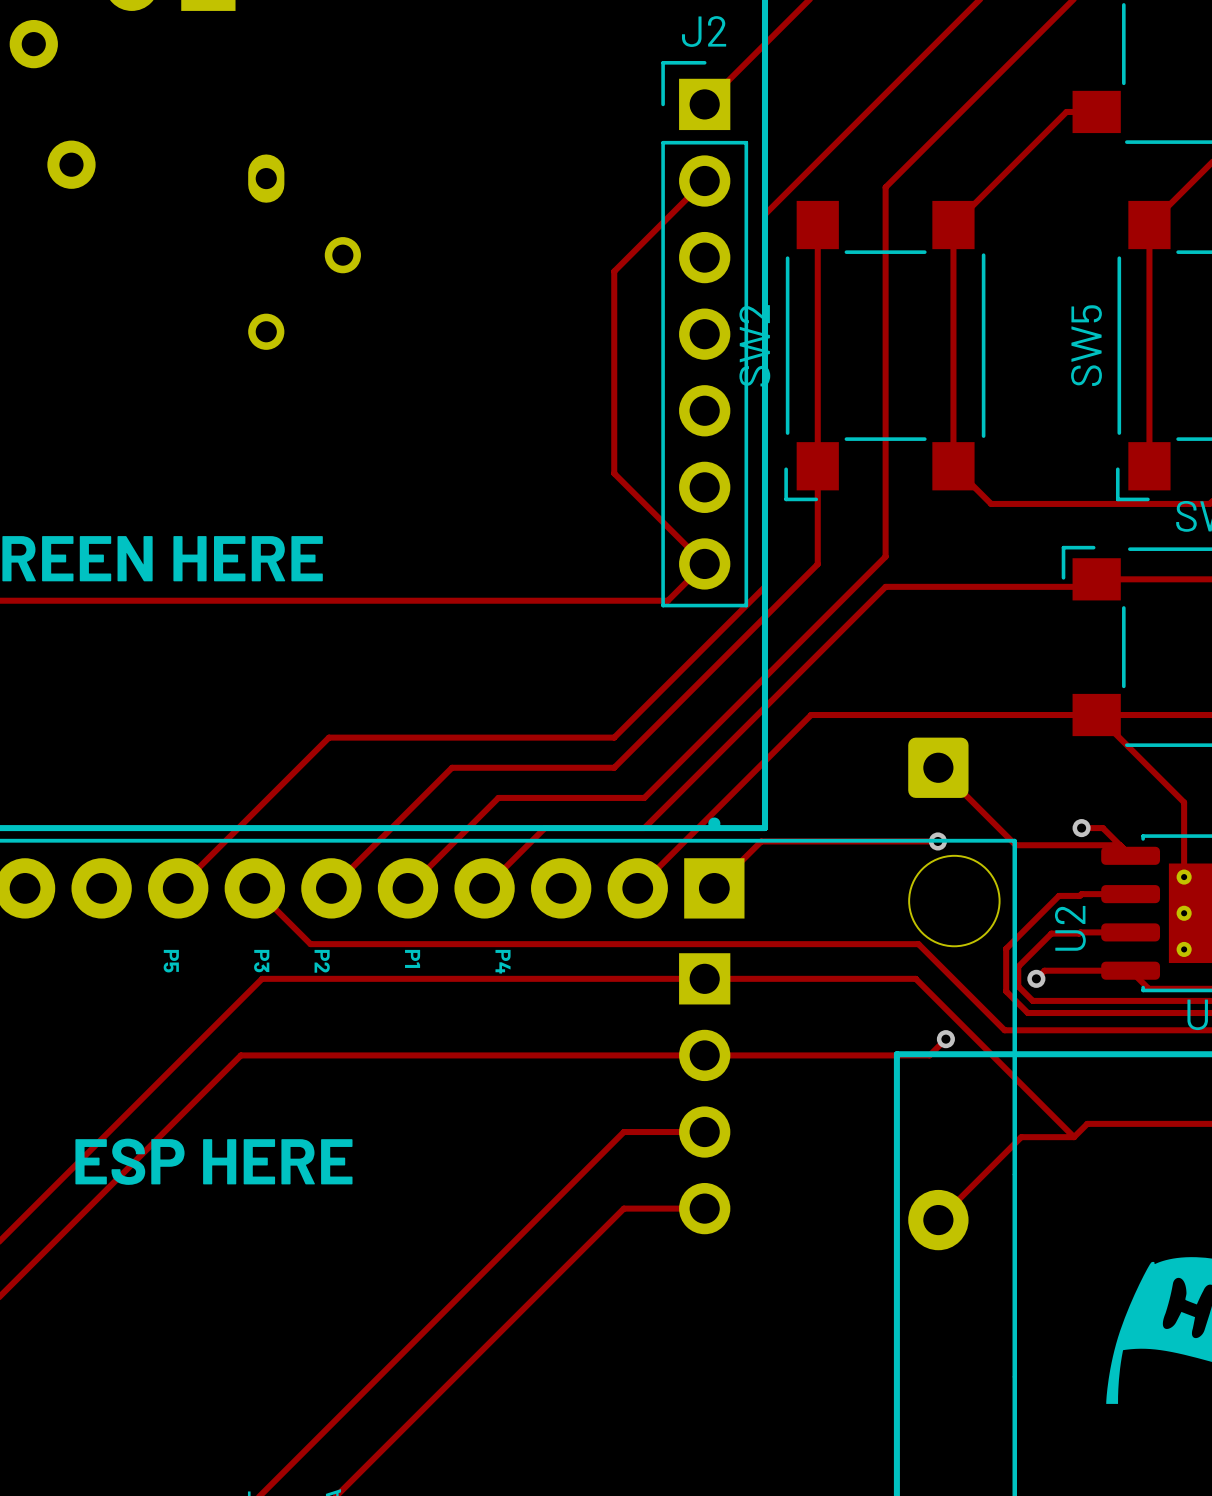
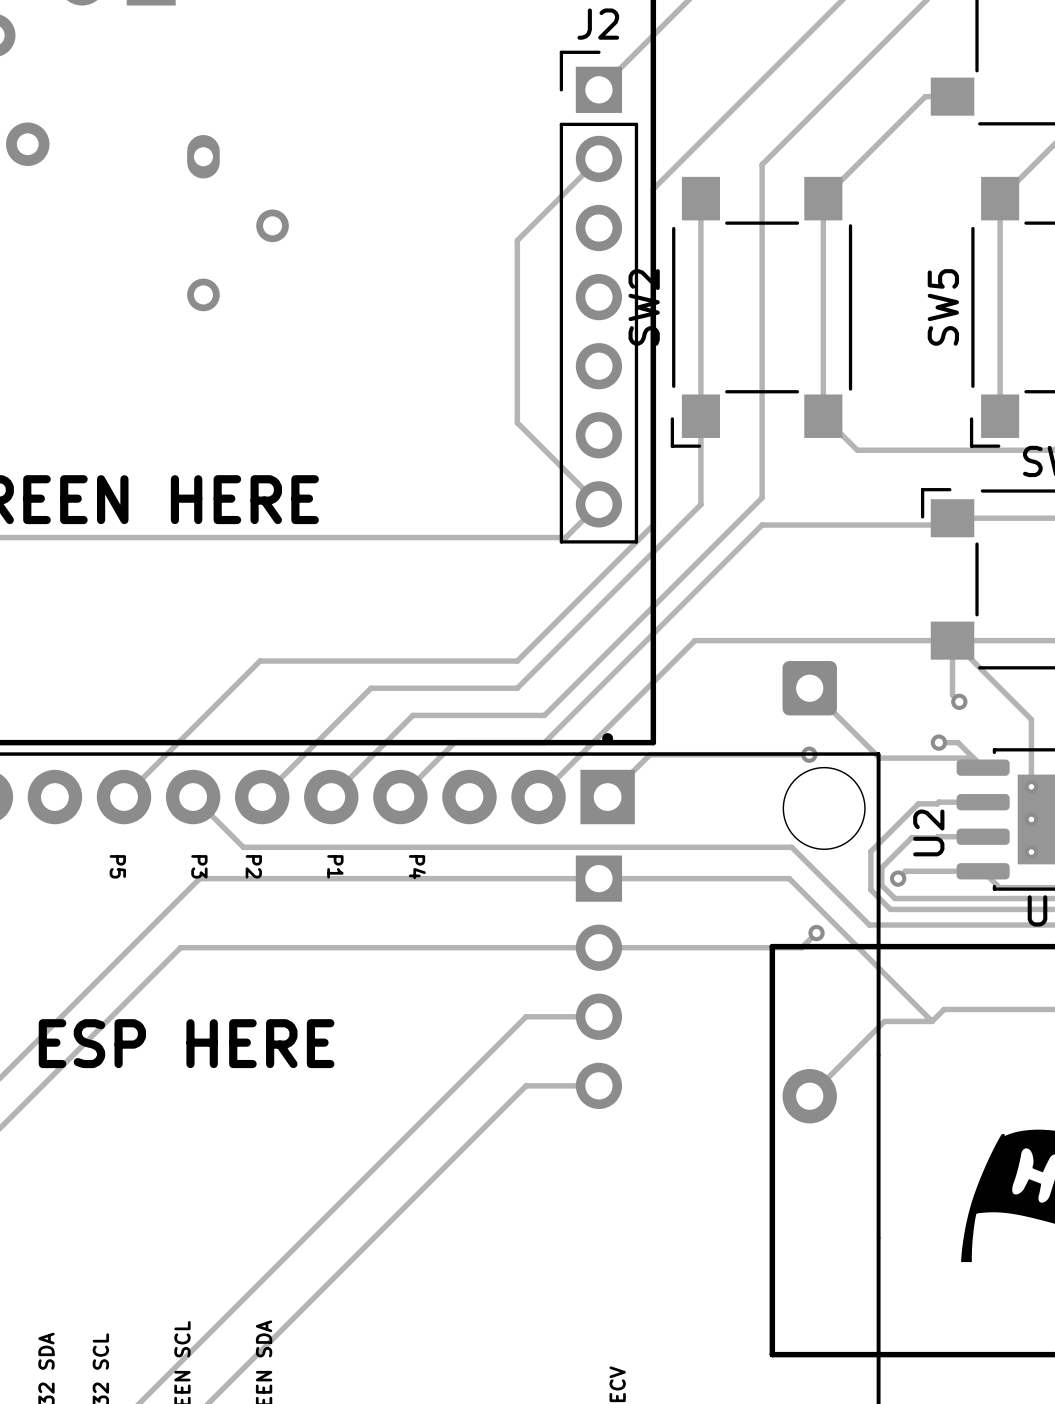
track: none -> (952, 640) (952, 695) (959, 701)
via: none -> (959, 701)

